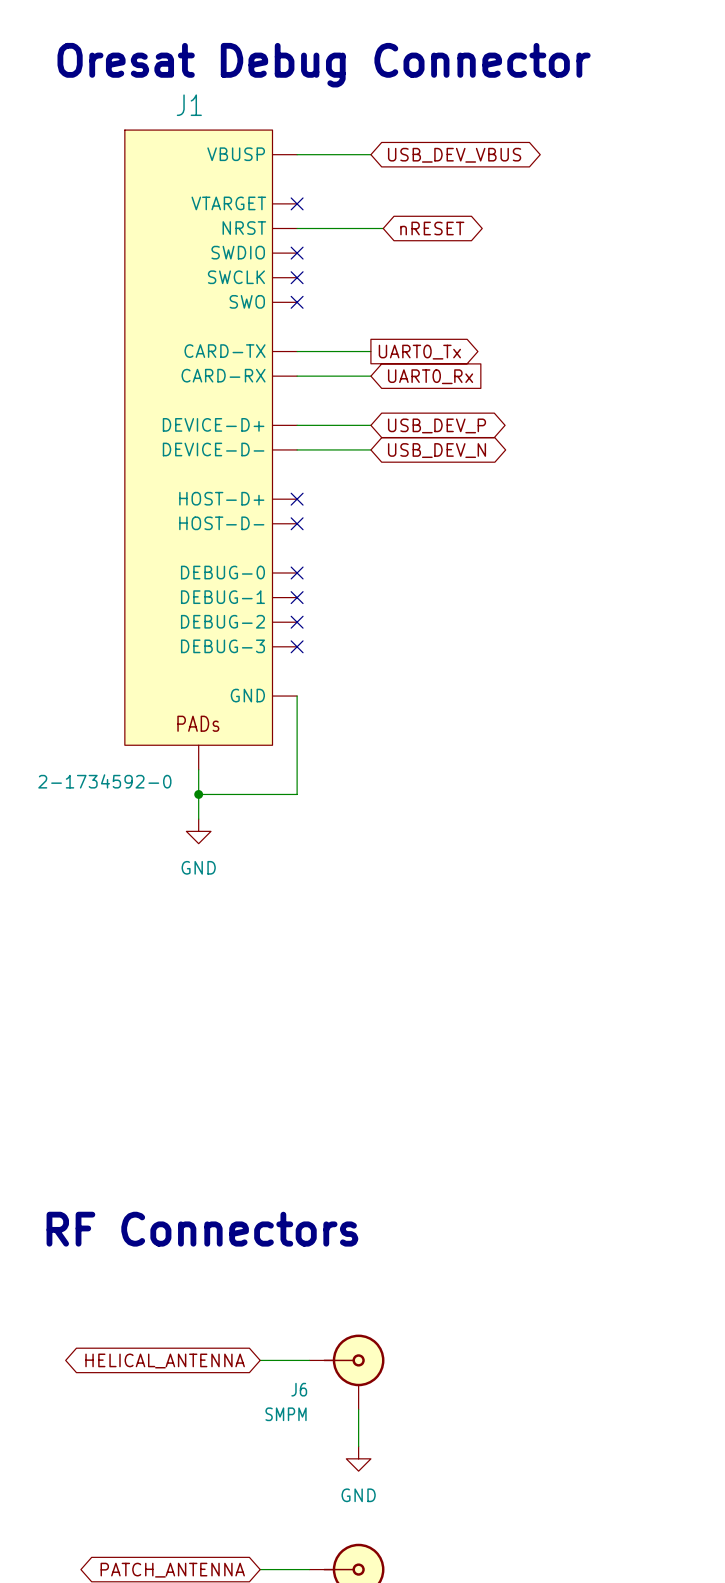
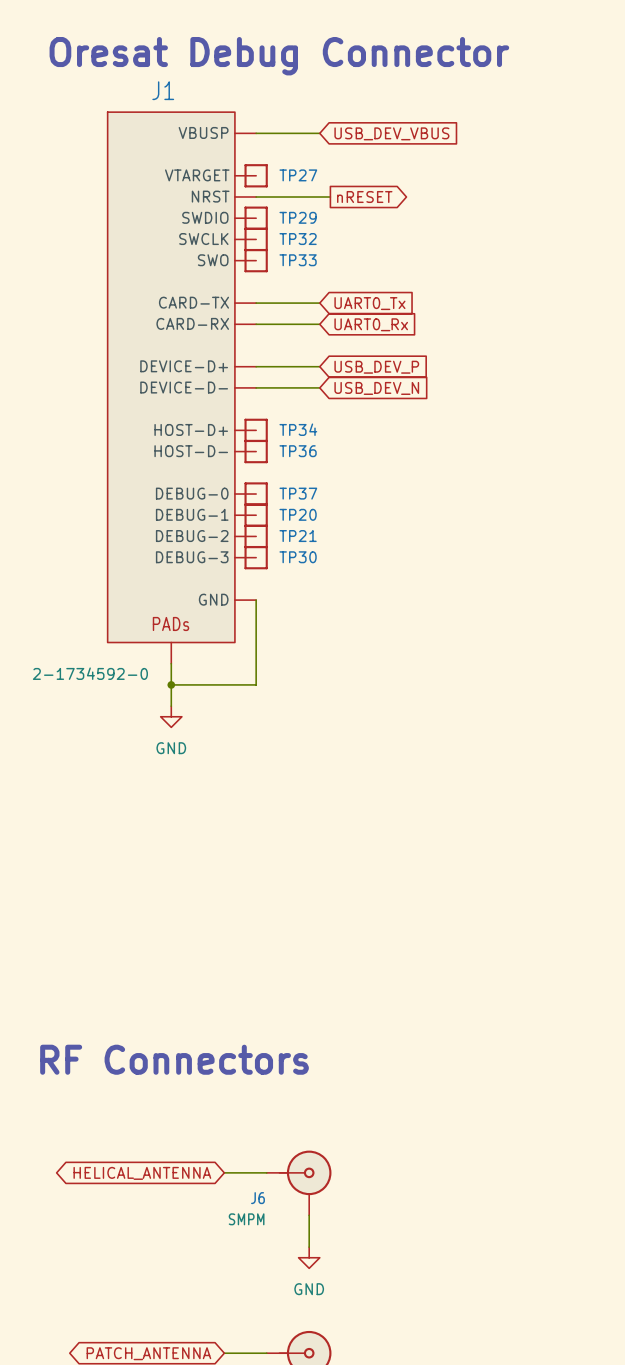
global label shape: bidirectional (454, 155) -> input (391, 133)
no-connect mark: (297, 203) -> none
TP27: none -> (256, 175)
global label shape: bidirectional (432, 228) -> output (364, 197)
no-connect mark: (297, 253) -> none
TP29: none -> (256, 218)
no-connect mark: (297, 277) -> none
TP32: none -> (256, 239)
no-connect mark: (297, 302) -> none
TP33: none -> (256, 260)
global label shape: output (419, 352) -> input (369, 303)
global label shape: bidirectional (437, 425) -> input (376, 367)
global label shape: bidirectional (437, 450) -> input (376, 388)
no-connect mark: (297, 499) -> none
TP34: none -> (256, 430)
no-connect mark: (297, 523) -> none
TP36: none -> (256, 451)
no-connect mark: (297, 572) -> none
TP37: none -> (256, 494)
no-connect mark: (297, 597) -> none
TP20: none -> (256, 515)
no-connect mark: (297, 622) -> none
TP21: none -> (256, 536)
no-connect mark: (297, 646) -> none
TP30: none -> (256, 557)

